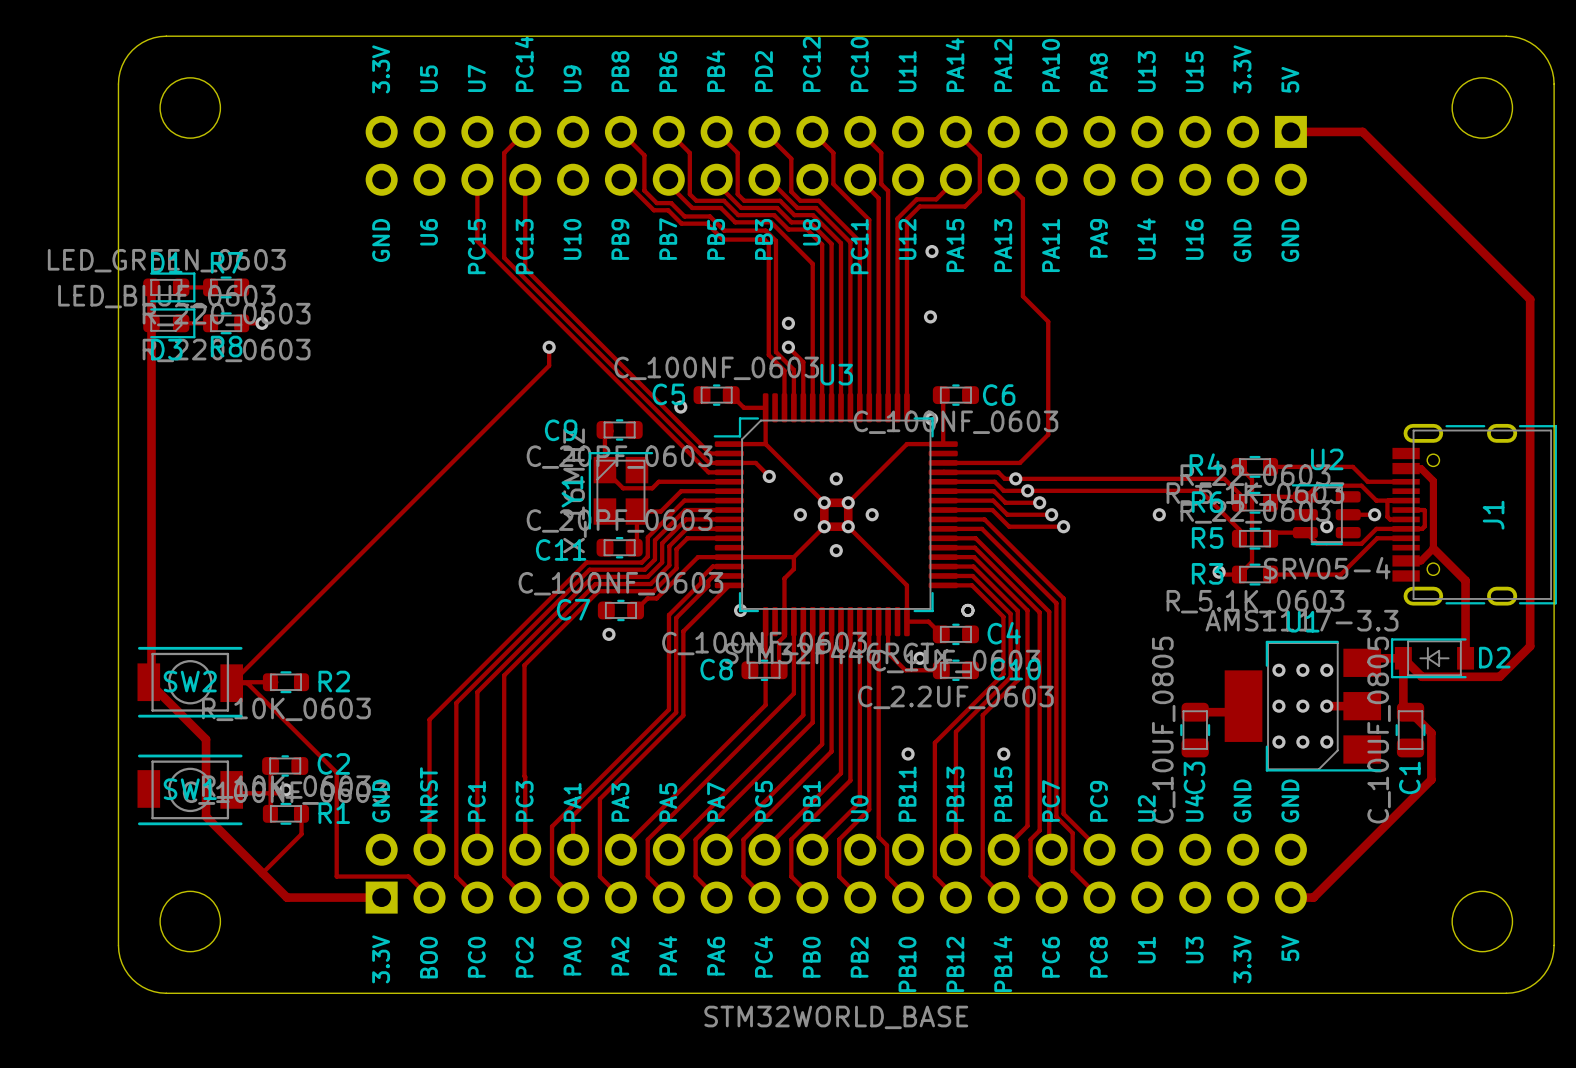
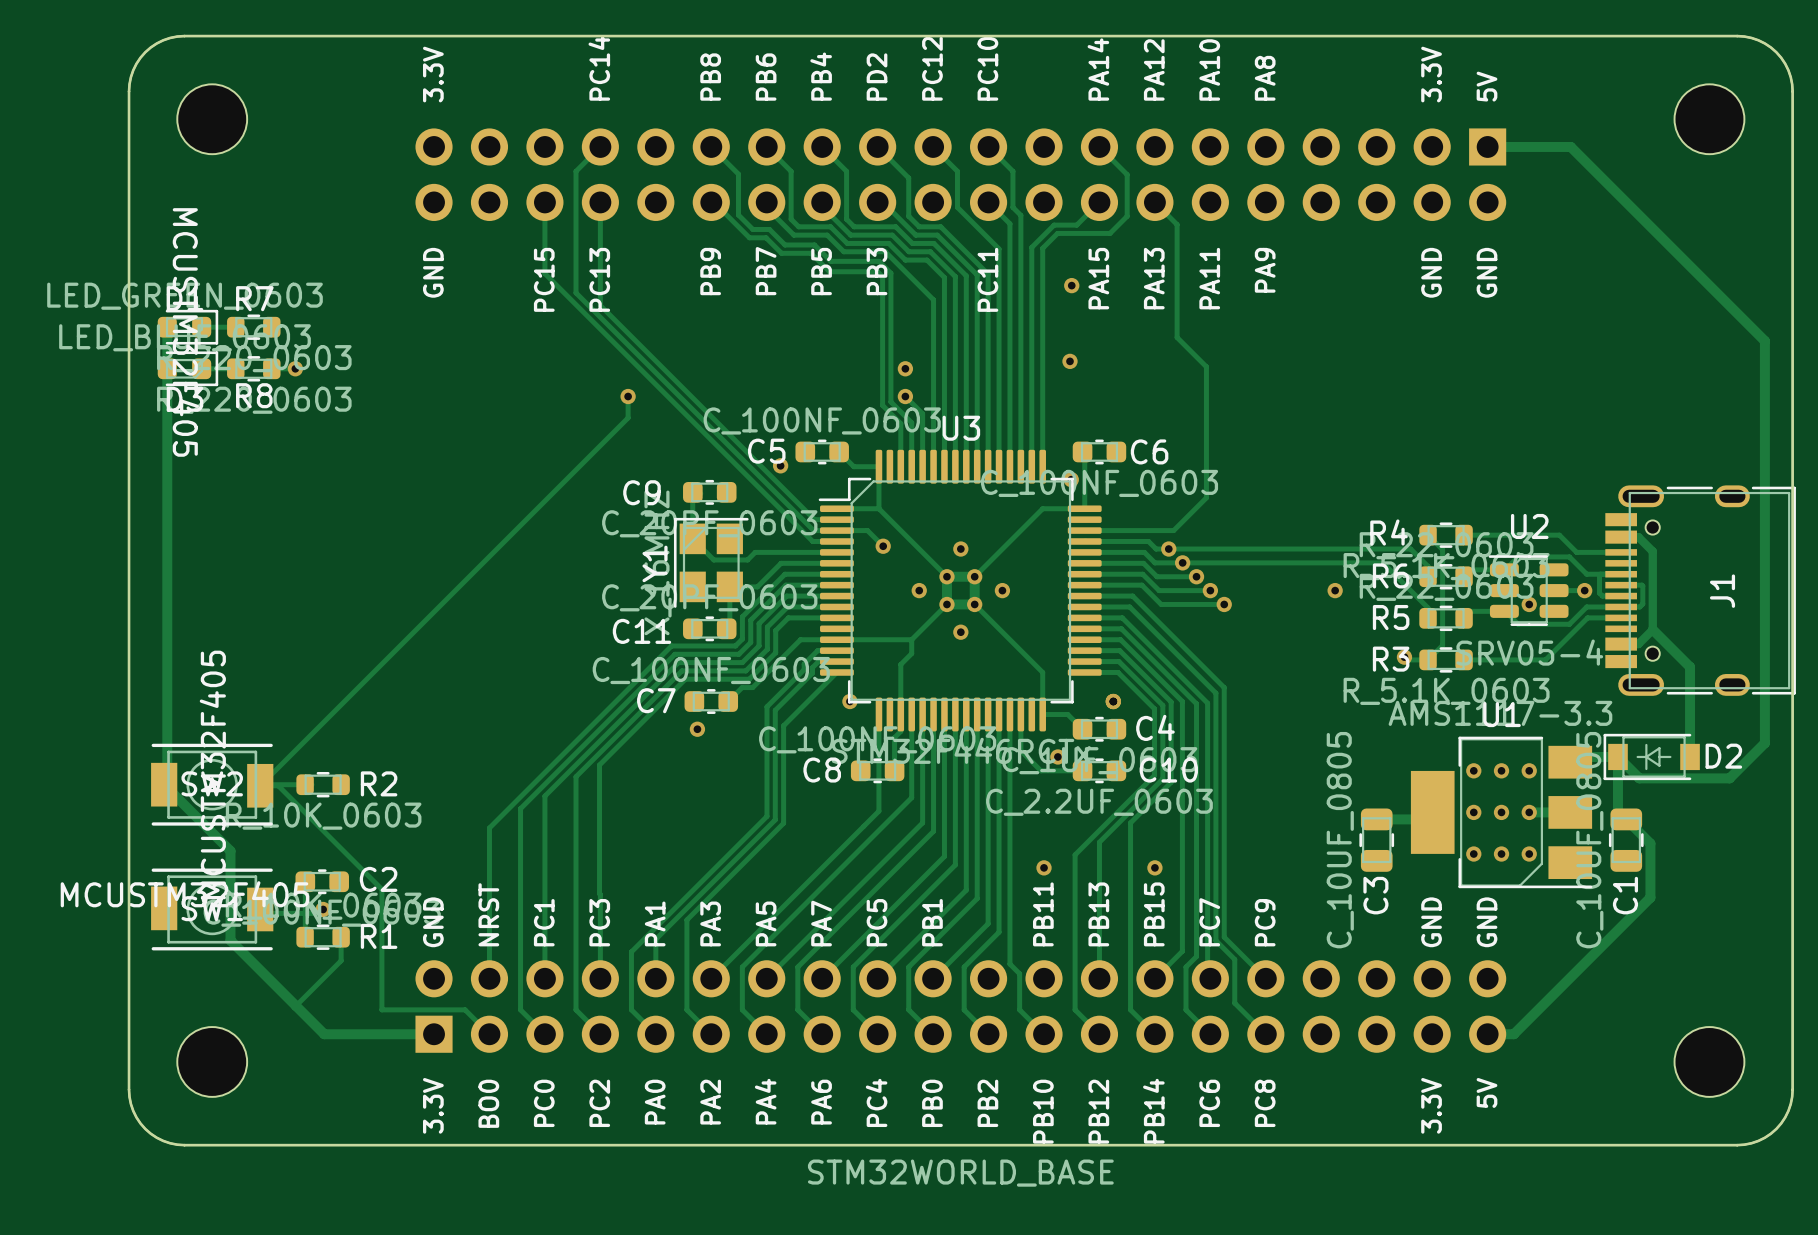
part footprint: [160, 77, 1513, 952] -> [127, 34, 1794, 1147]

